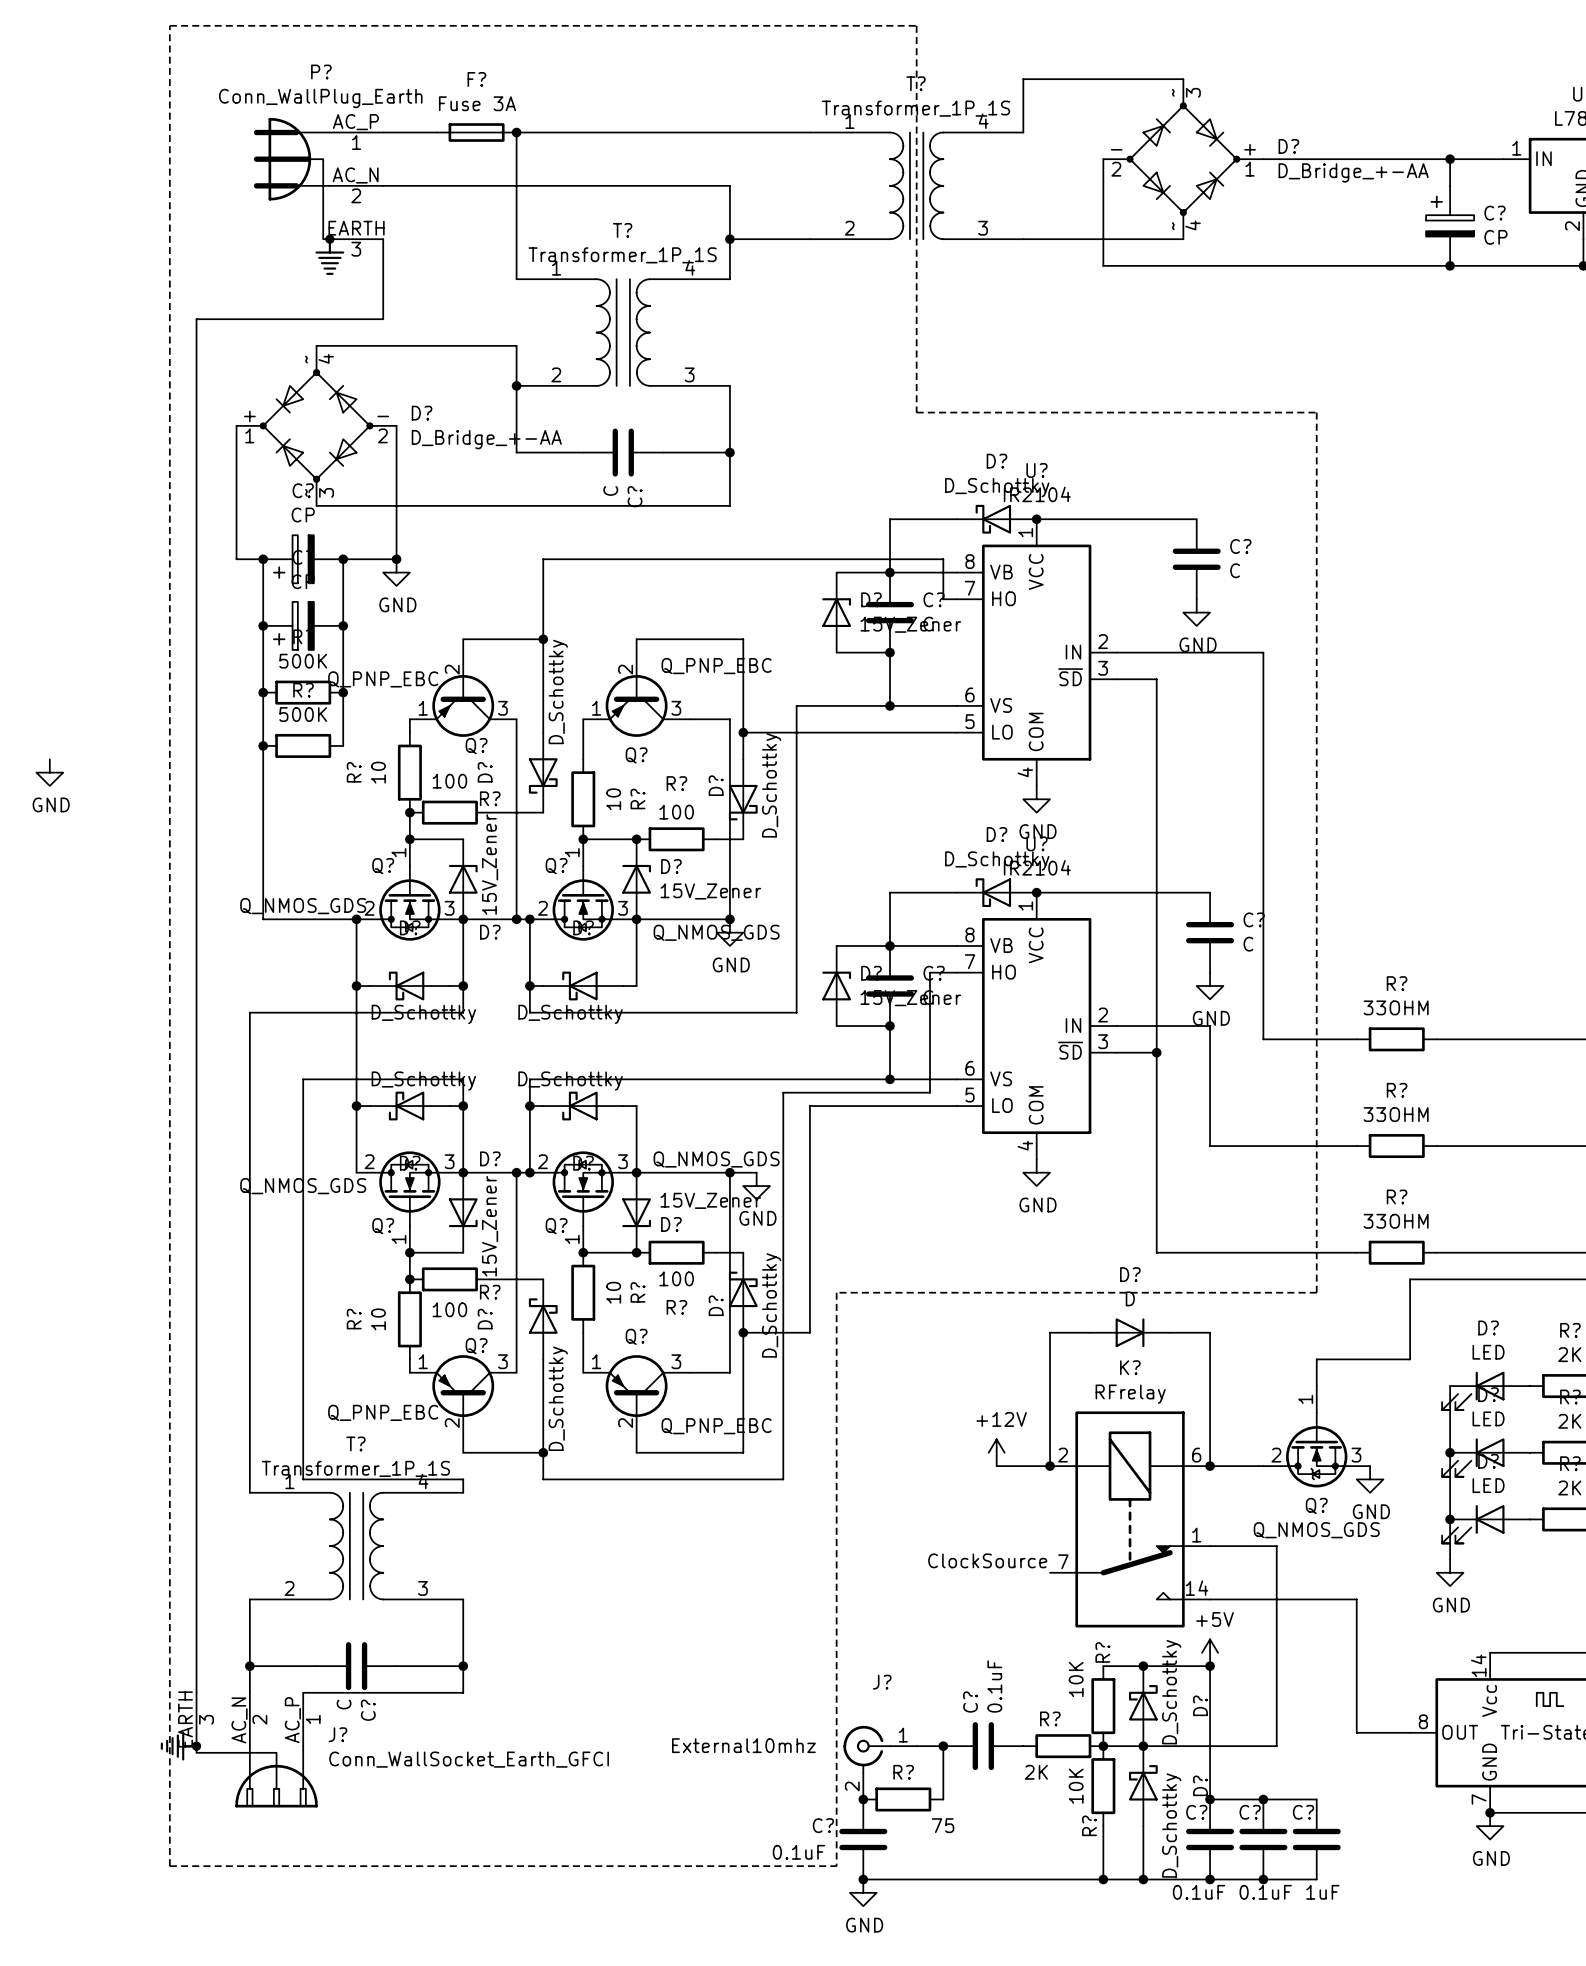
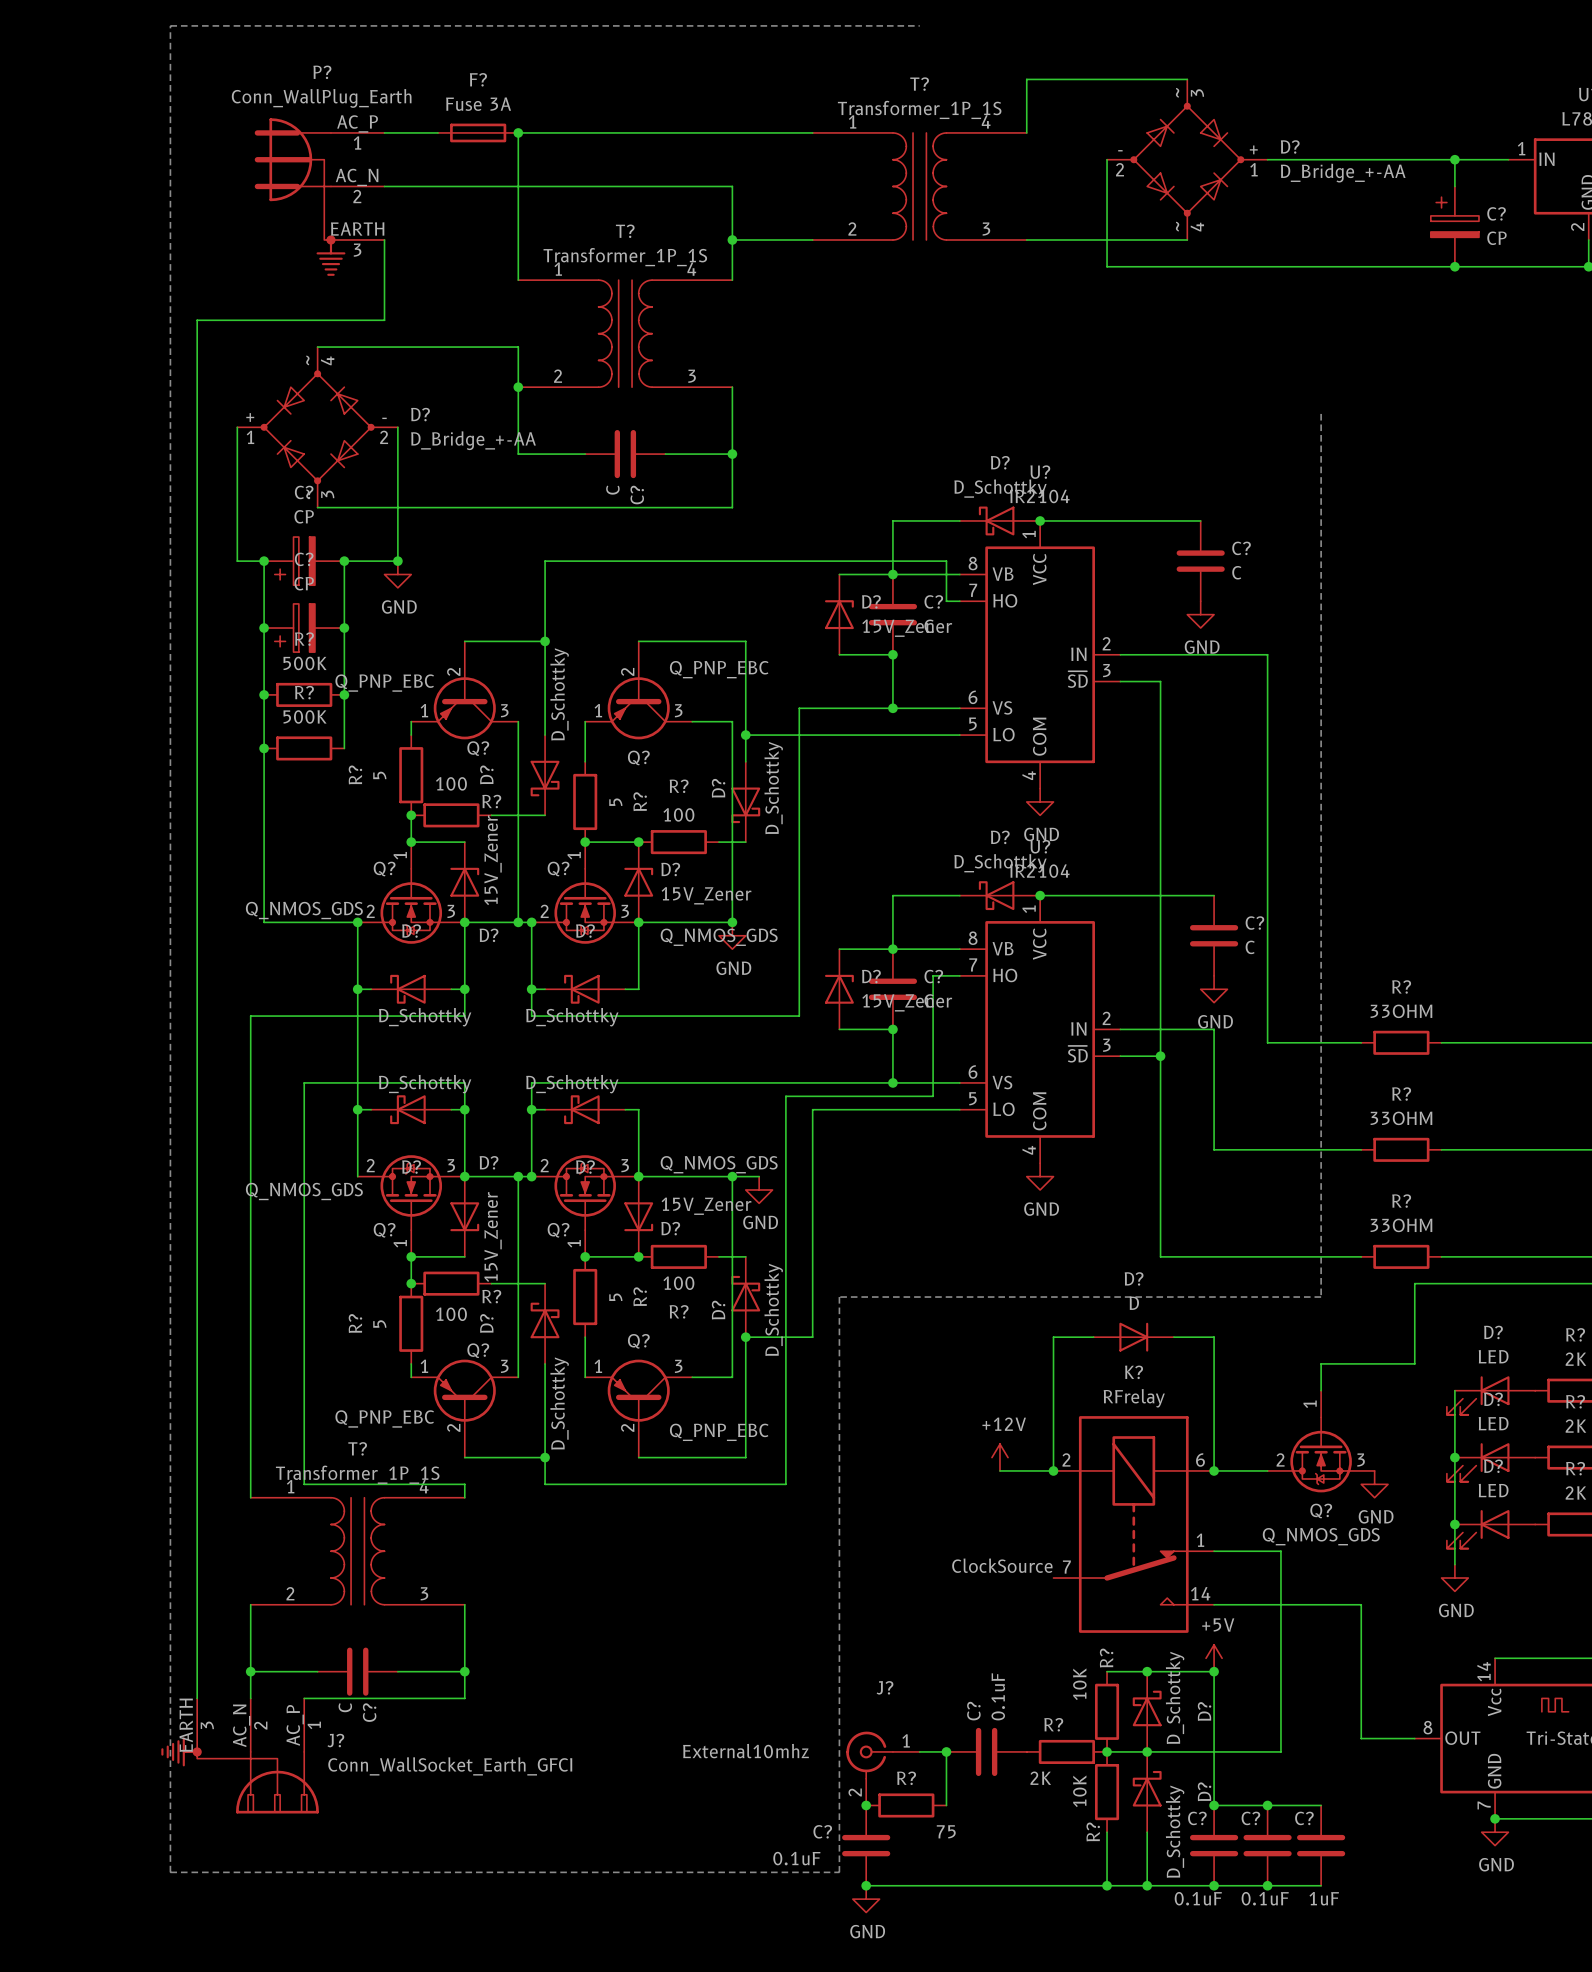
line: (916, 25) (916, 412) (1316, 412) -> none
power symbol: GND (49, 772) -> none
R? value: 10 (378, 772) -> 5 (379, 775)
R? value: 10 (613, 799) -> 5 (615, 802)
R? value: 10 (613, 1292) -> 5 (615, 1297)
R? value: 10 (378, 1319) -> 5 (379, 1324)

